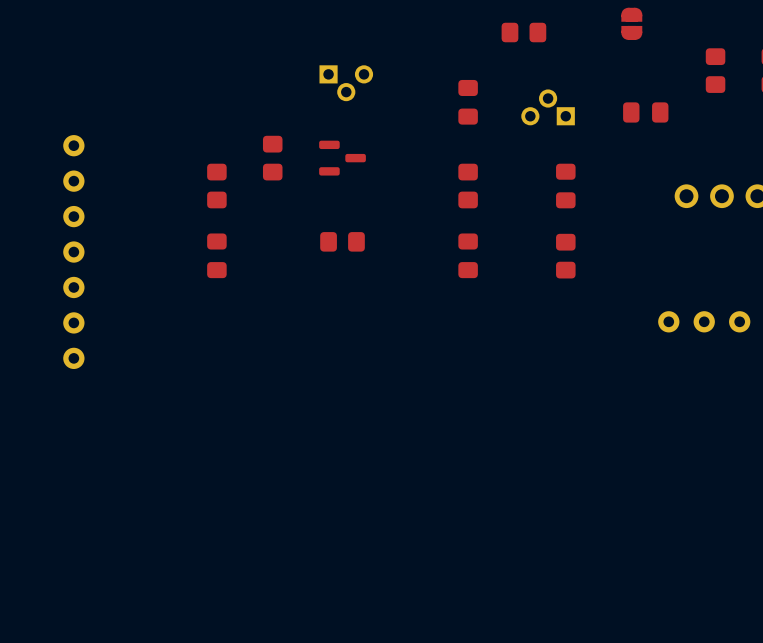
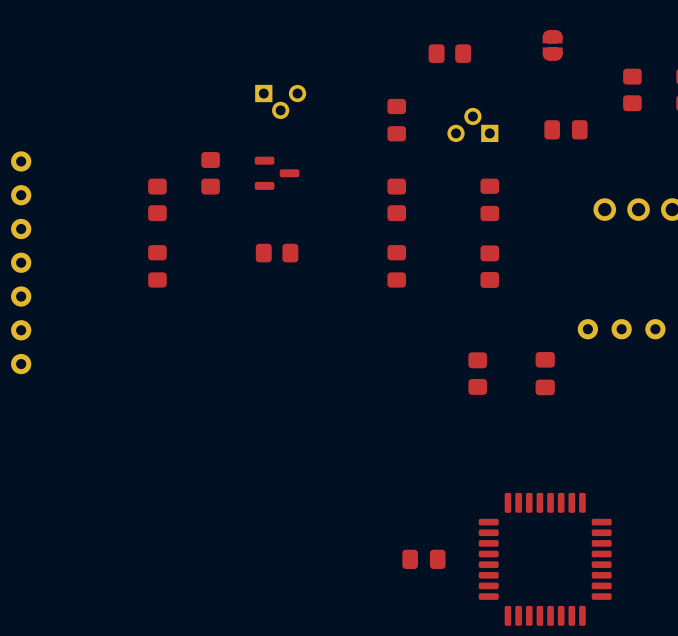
part: none -> (477, 373)
part: none -> (545, 373)
part: none -> (423, 559)
part: none -> (545, 559)

